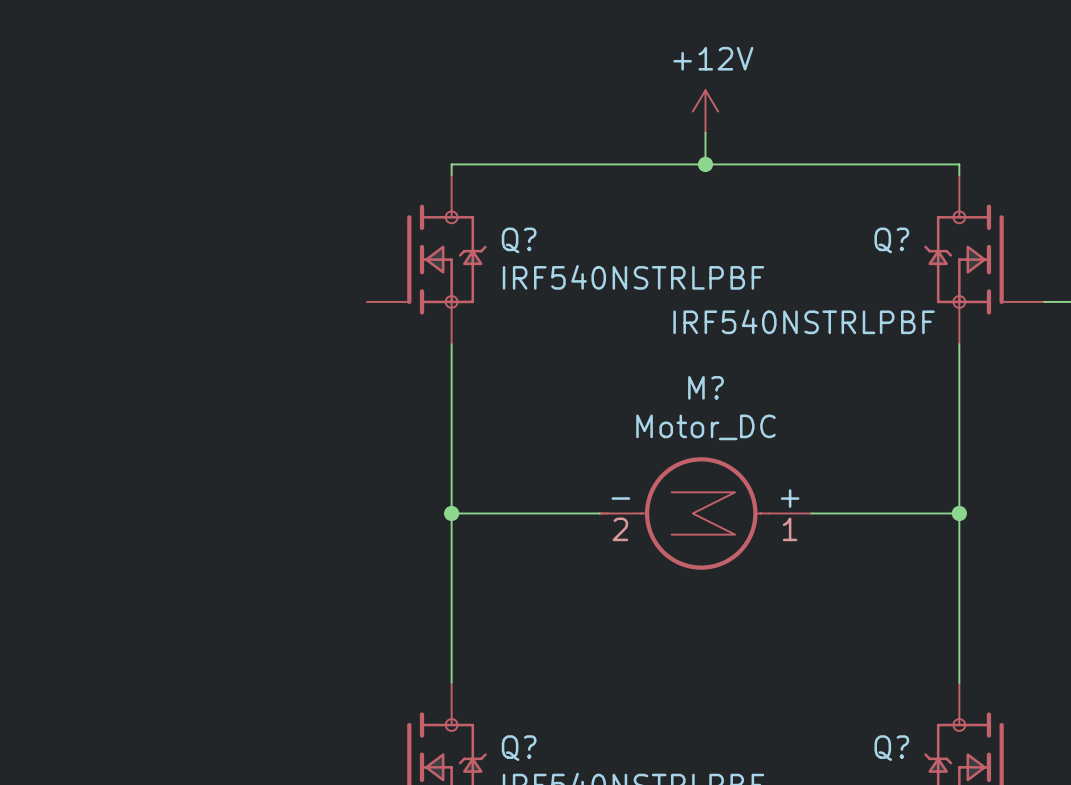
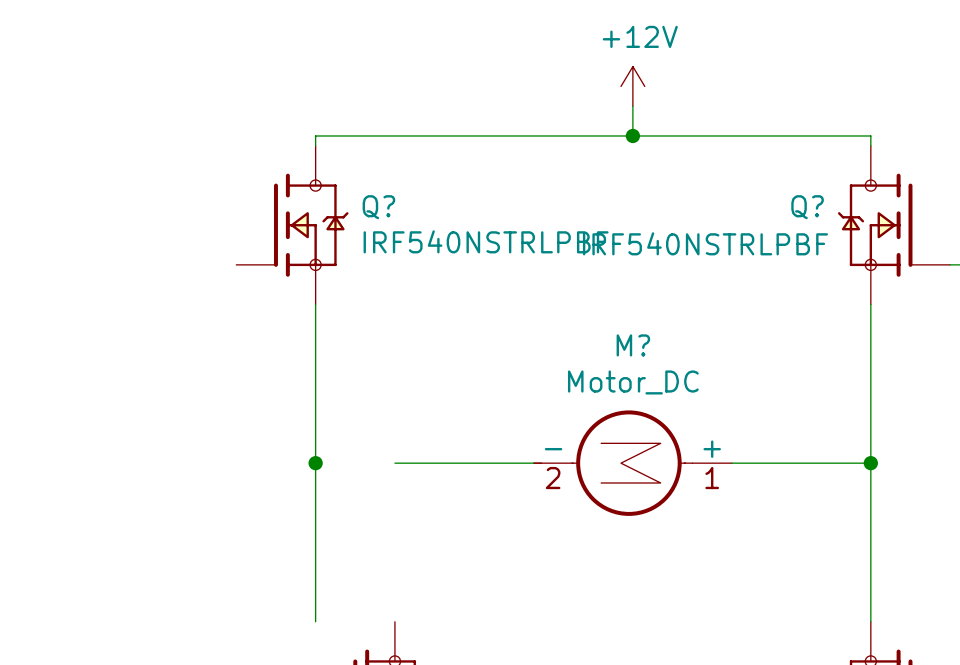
wire: (451, 164) (451, 175) -> (394, 135) (315, 135) (315, 145)
Q? position: (426, 259) -> (292, 225)
Q? value position: IRF540NSTRLPBF (804, 321) -> IRF540NSTRLPBF (705, 243)
wire: (451, 344) (451, 682) -> (315, 304) (315, 621)
junction position: (451, 513) -> (315, 463)

